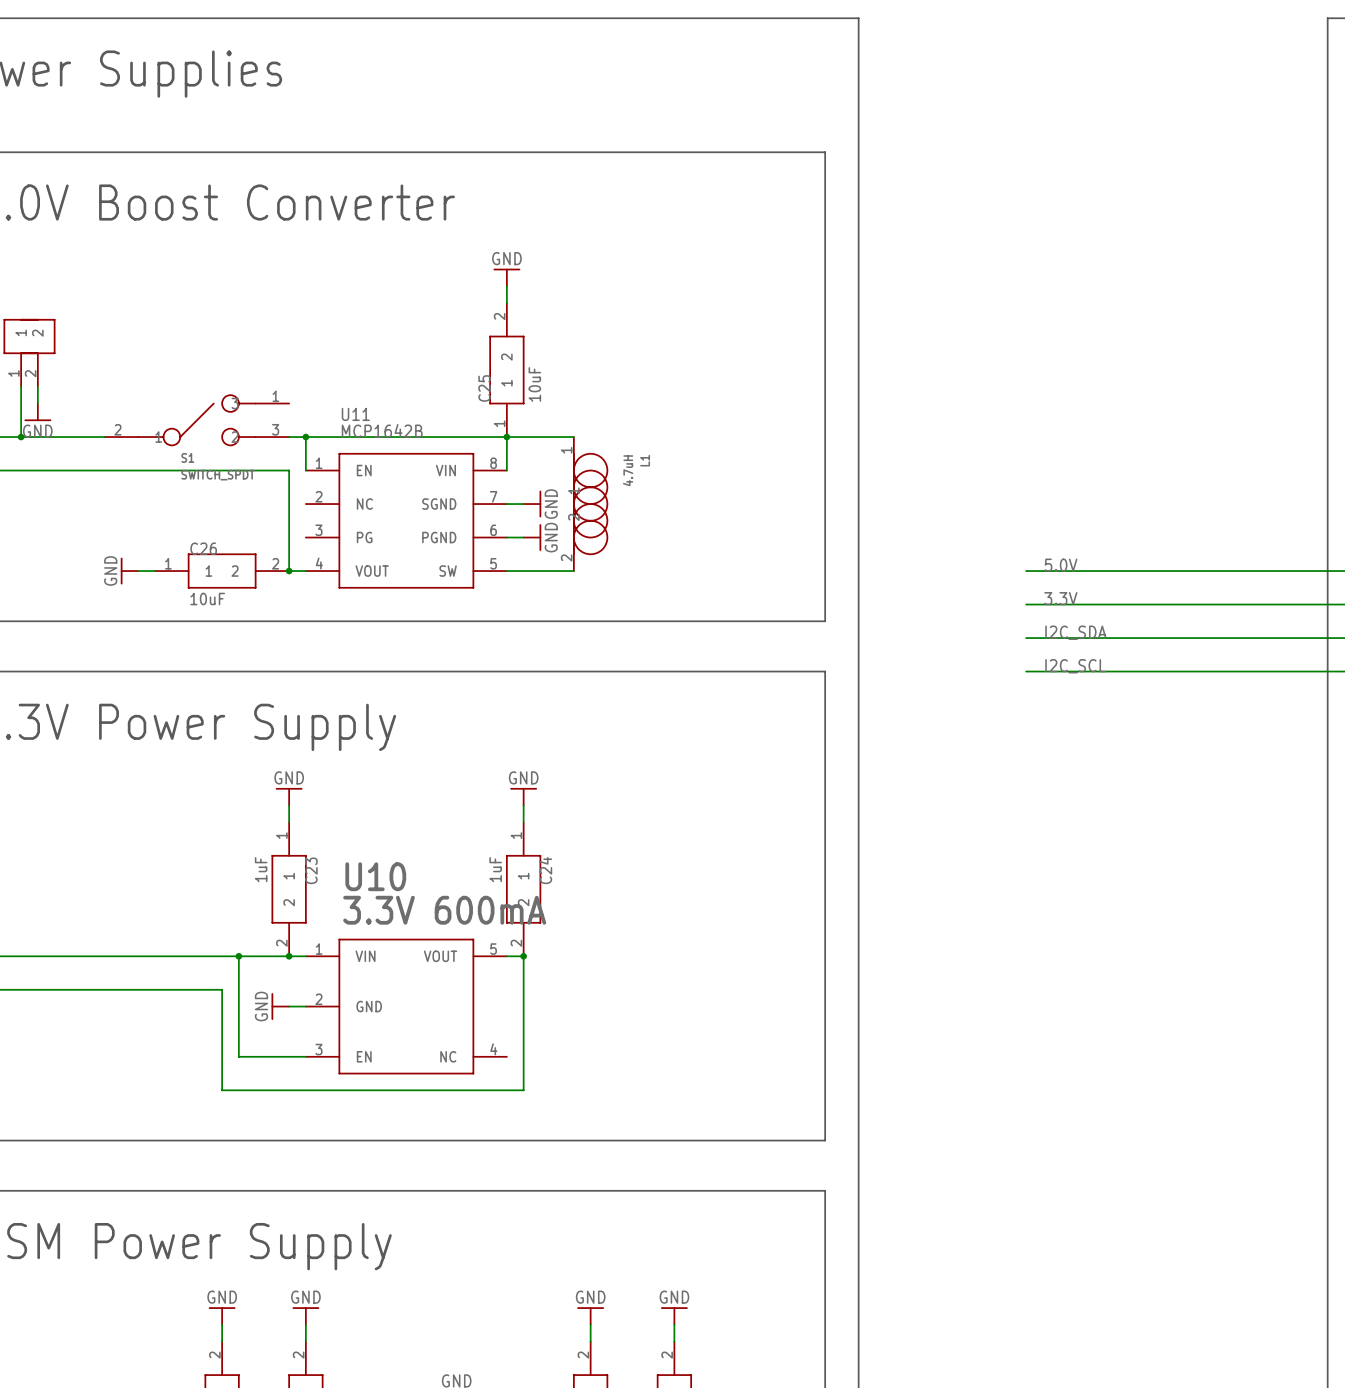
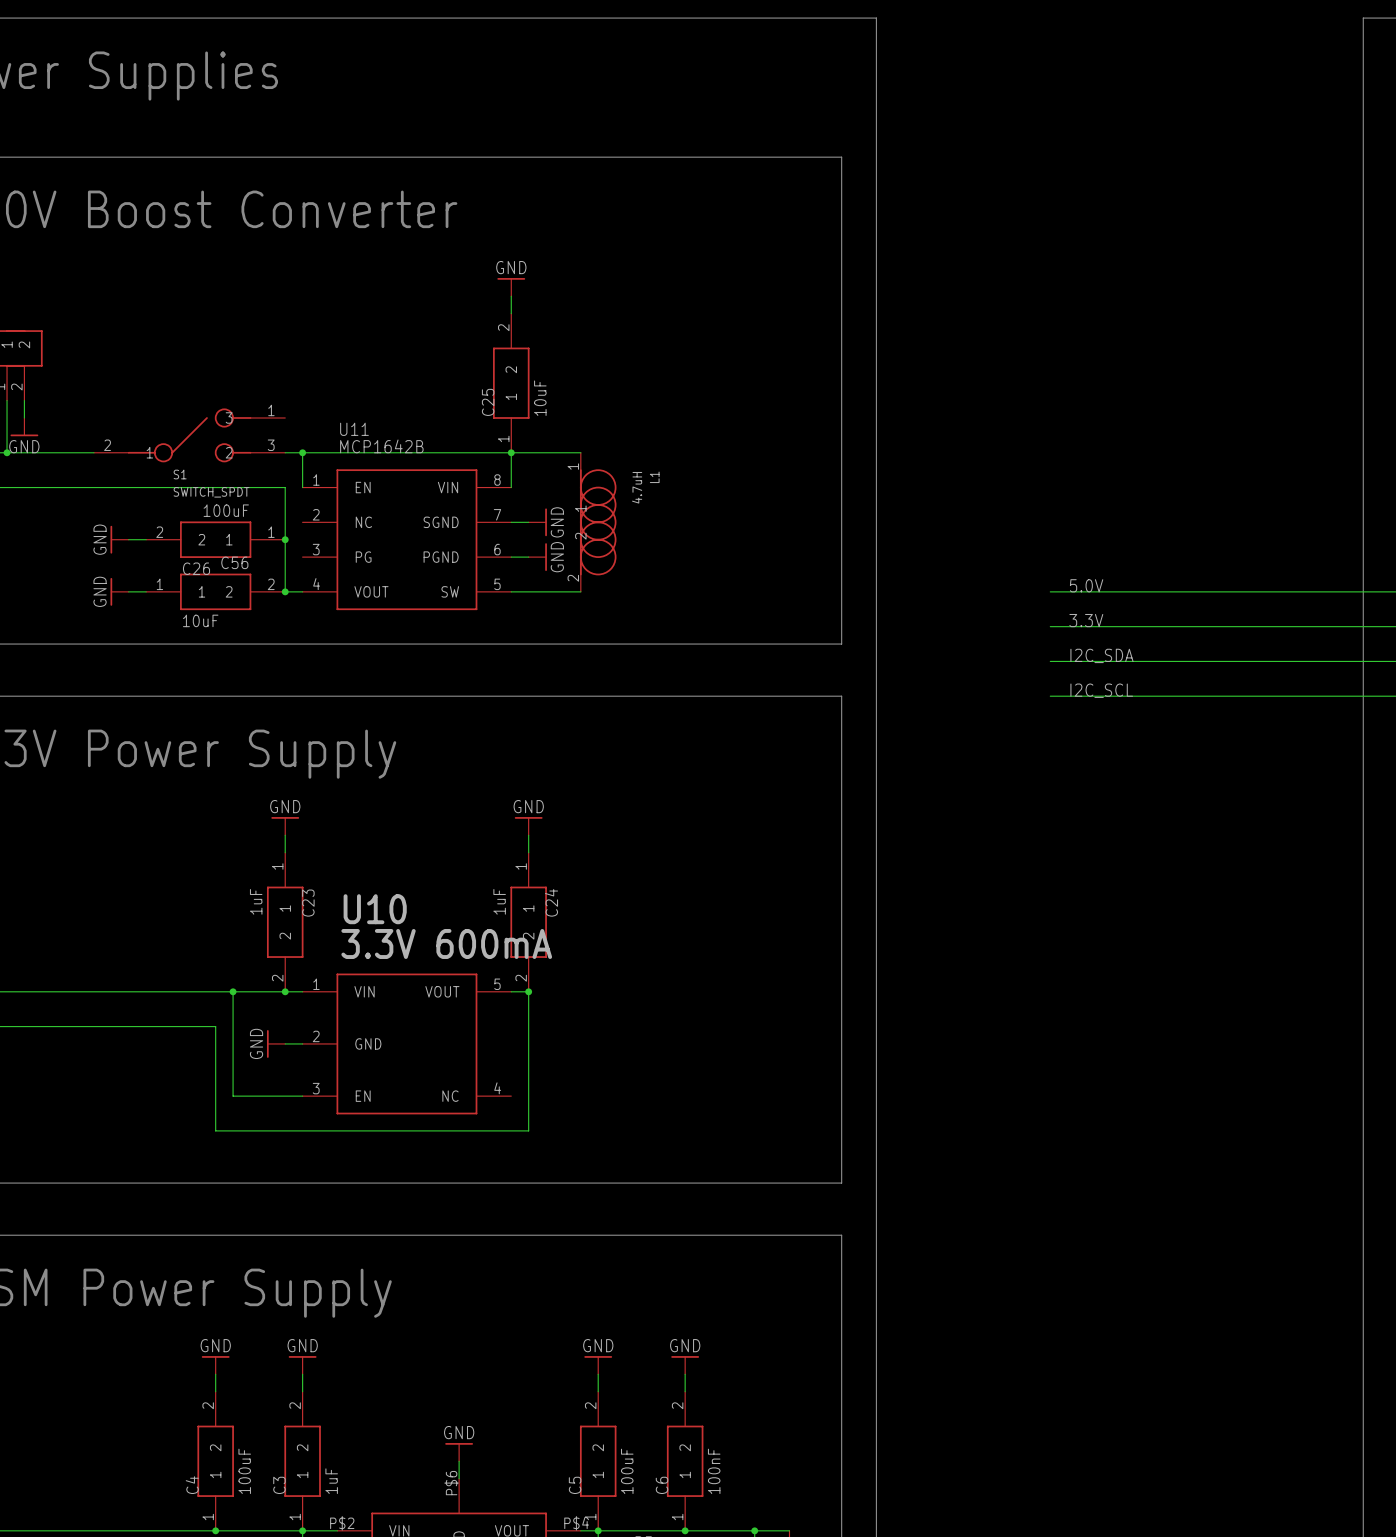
power symbol: none -> GND (119, 539)
wire: none -> (128, 539) (146, 539)
C56: none -> 100uF (215, 539)
junction: none -> (285, 539)

